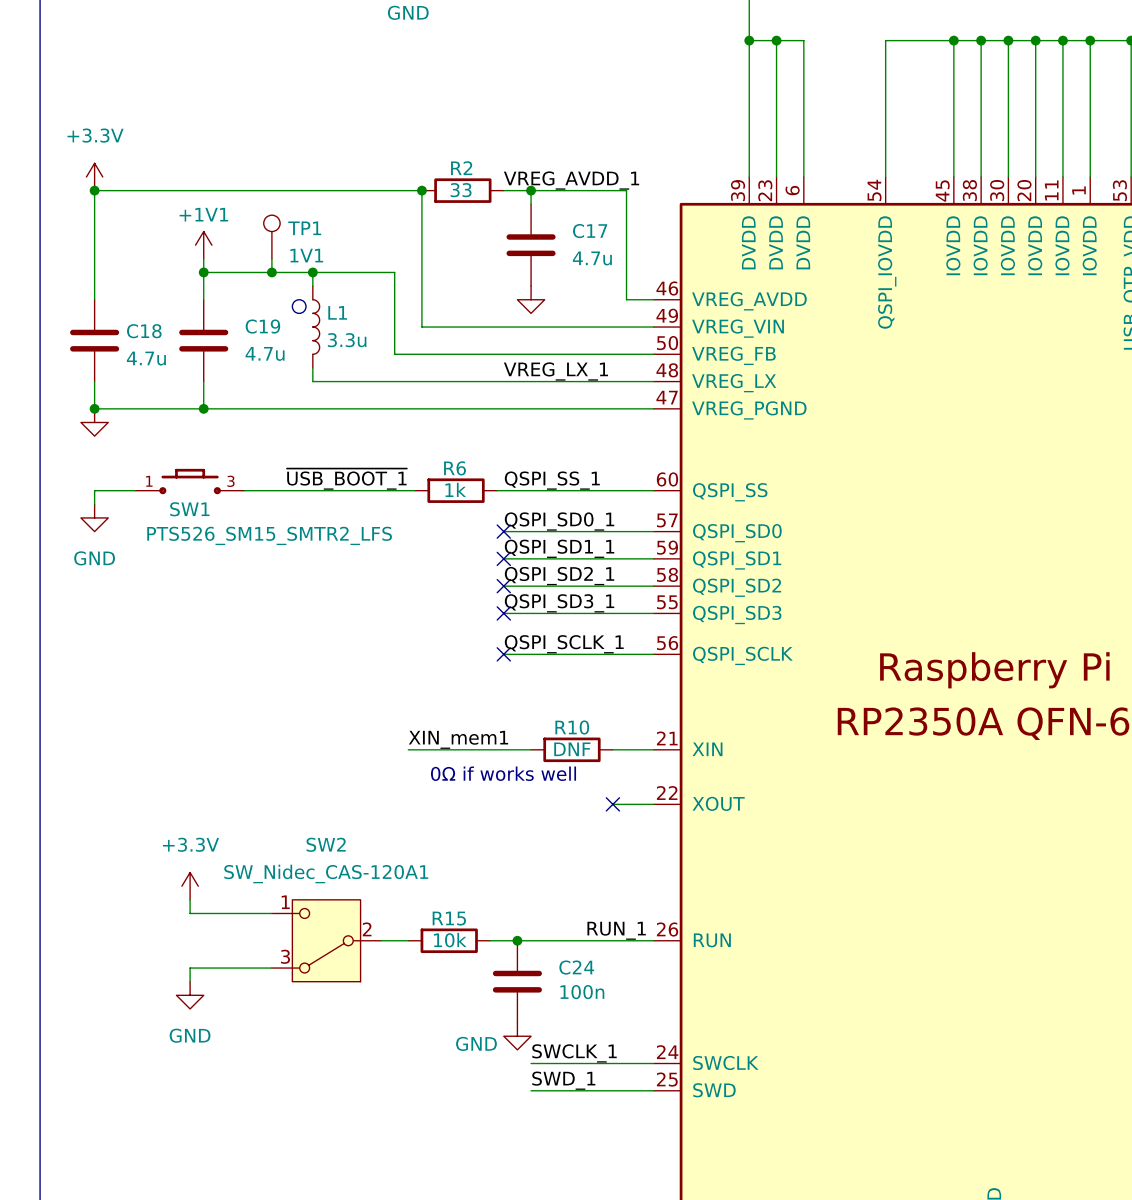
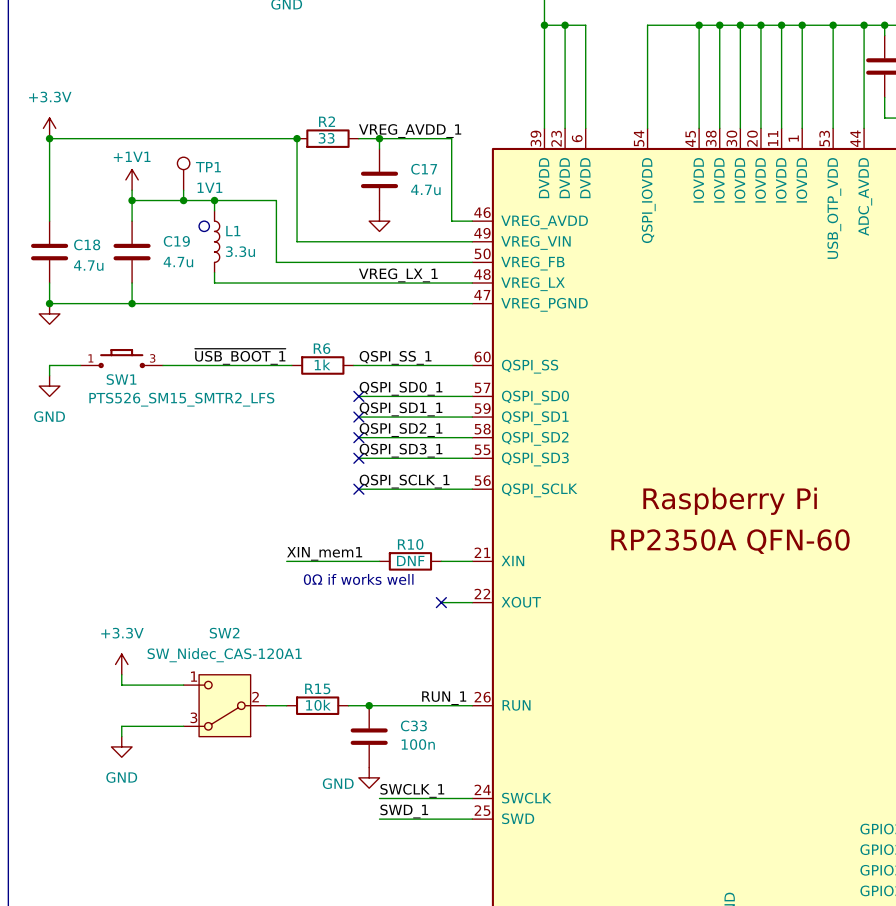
C24 name: C24 (576, 967) -> C33 (413, 725)

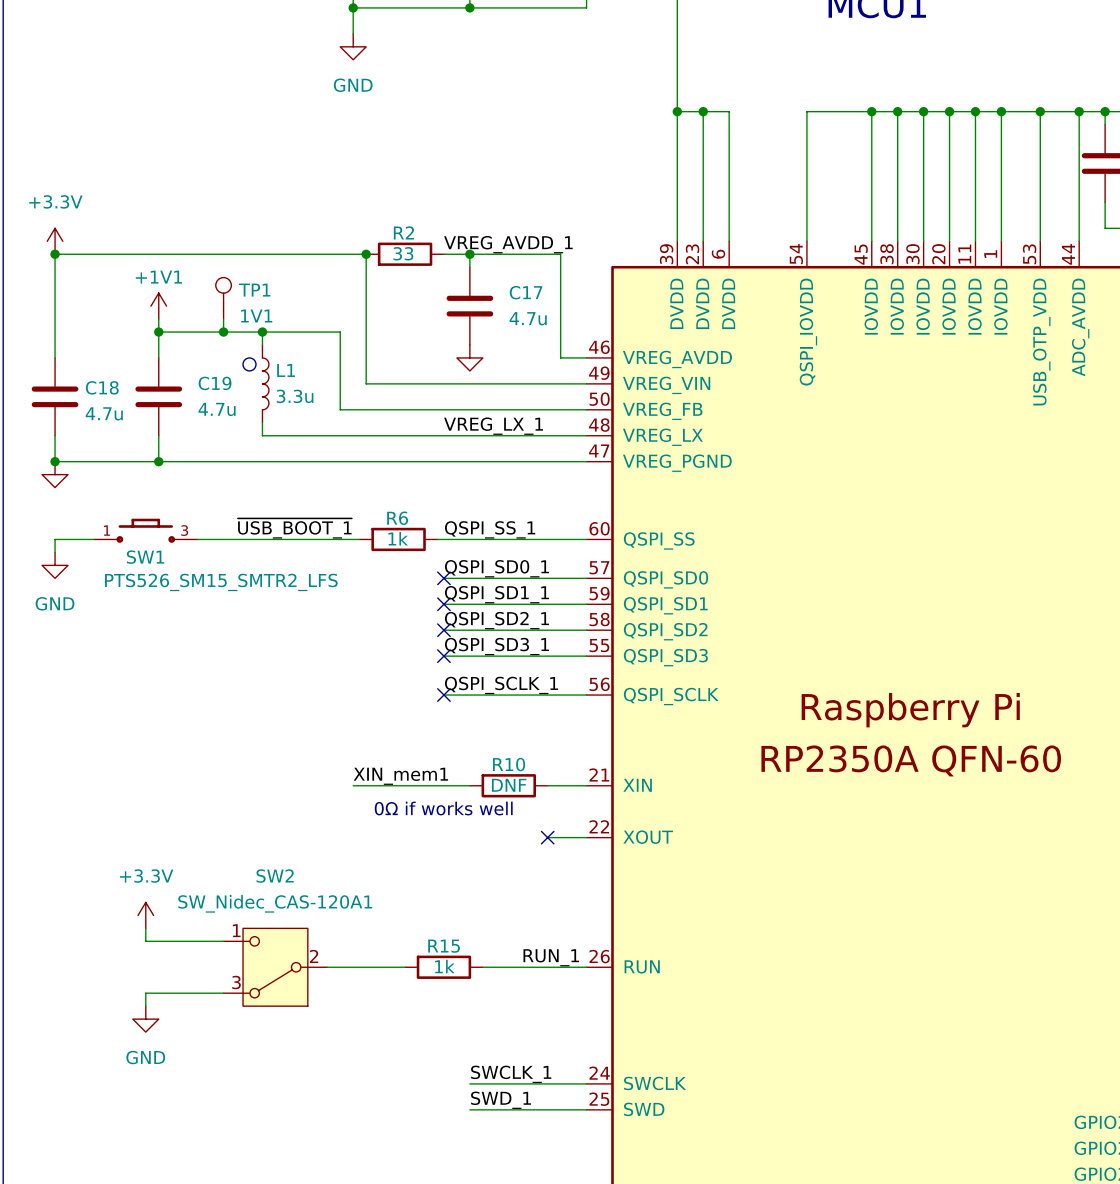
R15 position: (317, 705) -> (443, 967)
R15 value: 10k (318, 705) -> 1k (444, 966)
wire: (348, 705) (389, 705) -> (353, 967) (405, 967)
junction: (369, 705) -> none
C33: 100n (369, 736) -> none
power symbol: GND (369, 777) -> none

